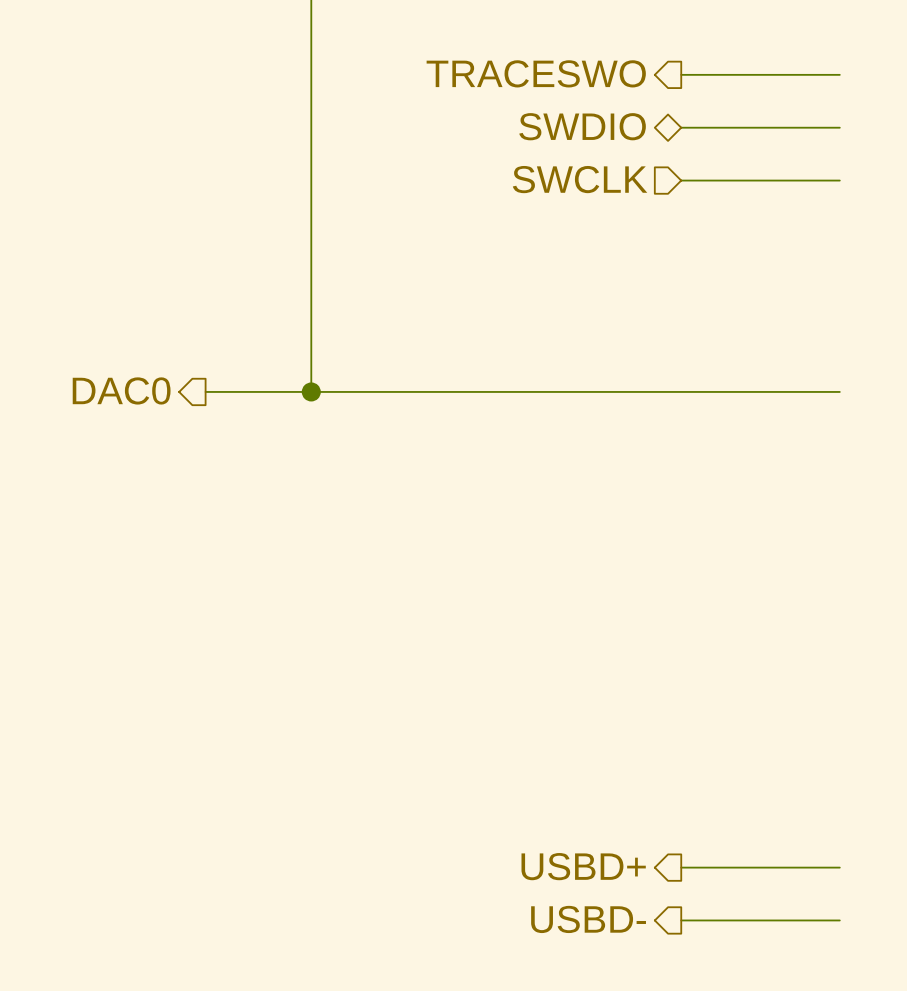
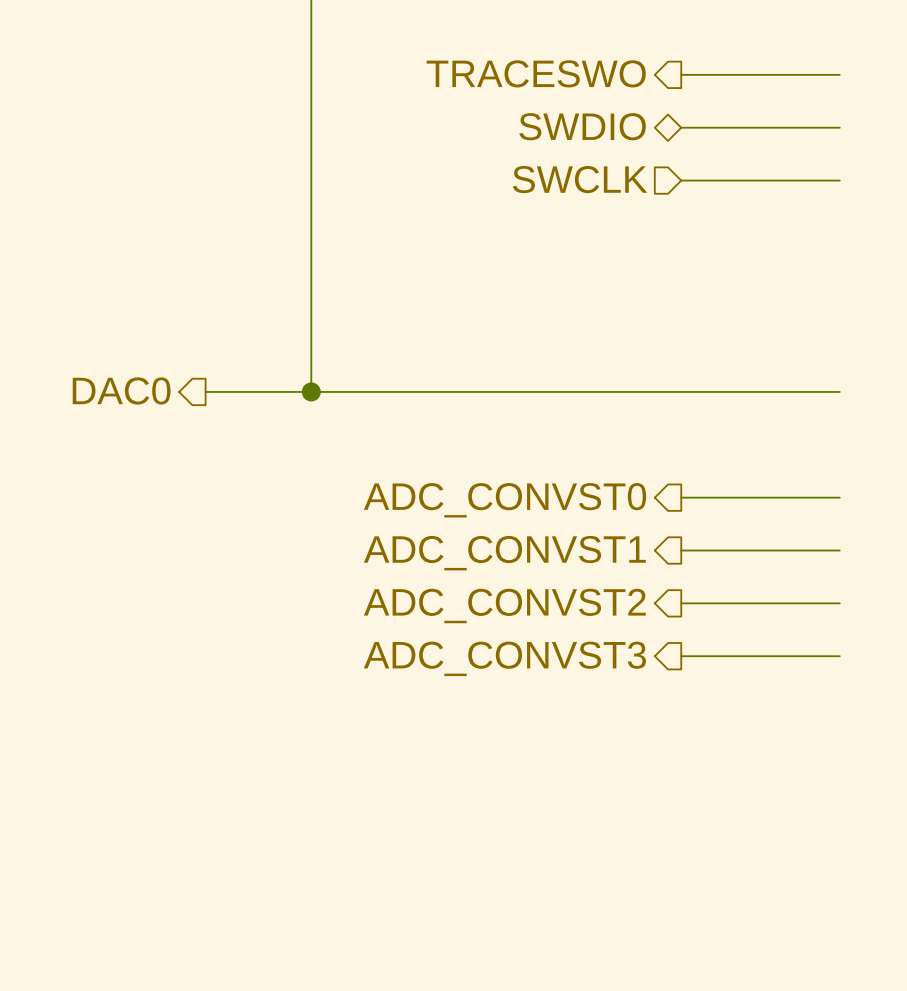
wire: none -> (681, 497) (839, 497)
hierarchical label: none -> ADC_CONVST0 (505, 500)
wire: none -> (681, 550) (839, 550)
hierarchical label: none -> ADC_CONVST1 (504, 553)
hierarchical label: none -> ADC_CONVST2 (504, 605)
hierarchical label: none -> ADC_CONVST3 (504, 658)
hierarchical label: USBD+ (583, 866) -> none
wire: (681, 867) (839, 867) -> (681, 603) (839, 603)
hierarchical label: USBD- (588, 919) -> none
wire: (681, 920) (839, 920) -> (681, 656) (839, 656)

